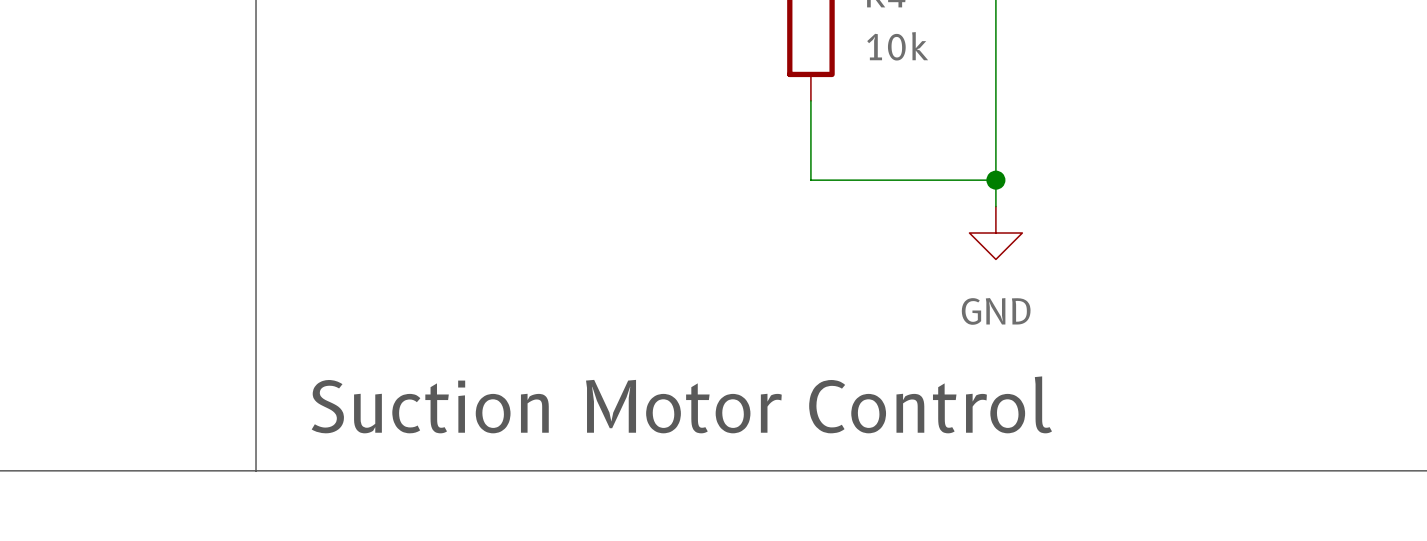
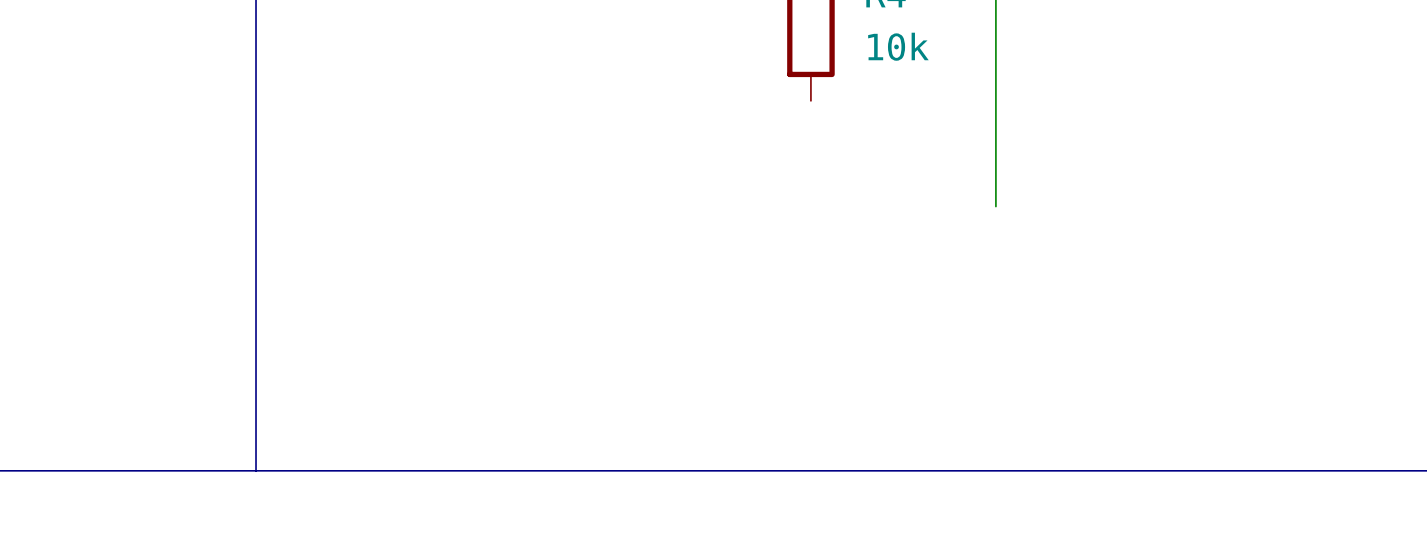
wire: (810, 100) (810, 180) (995, 180) -> none
junction: (995, 180) -> none
power symbol: GND (995, 233) -> none
text: Suction Motor Control (681, 404) -> none

